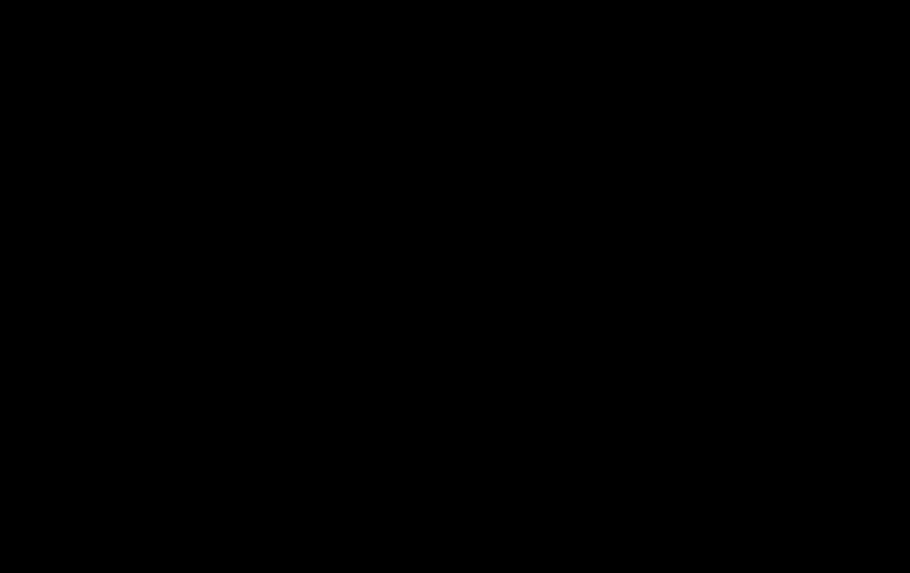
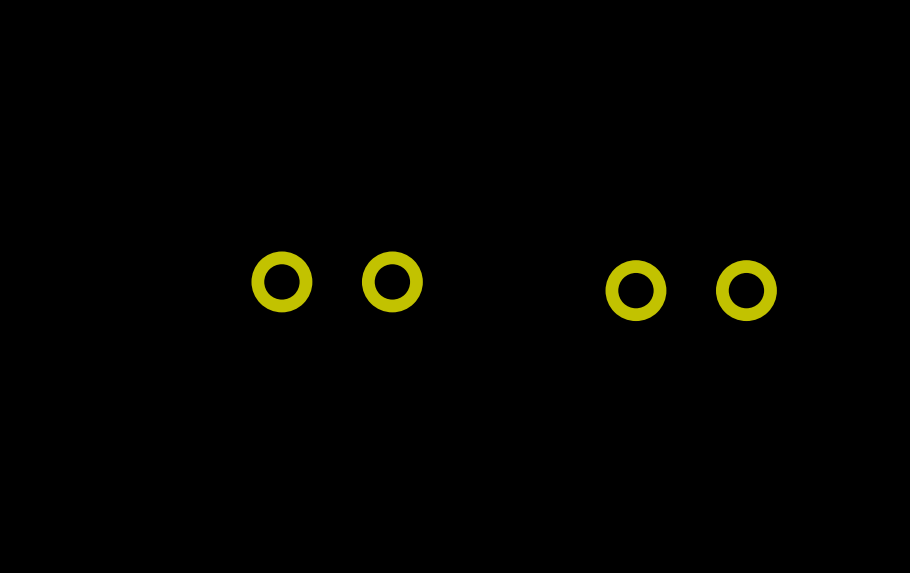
part: none -> (337, 281)
part: none -> (691, 290)

